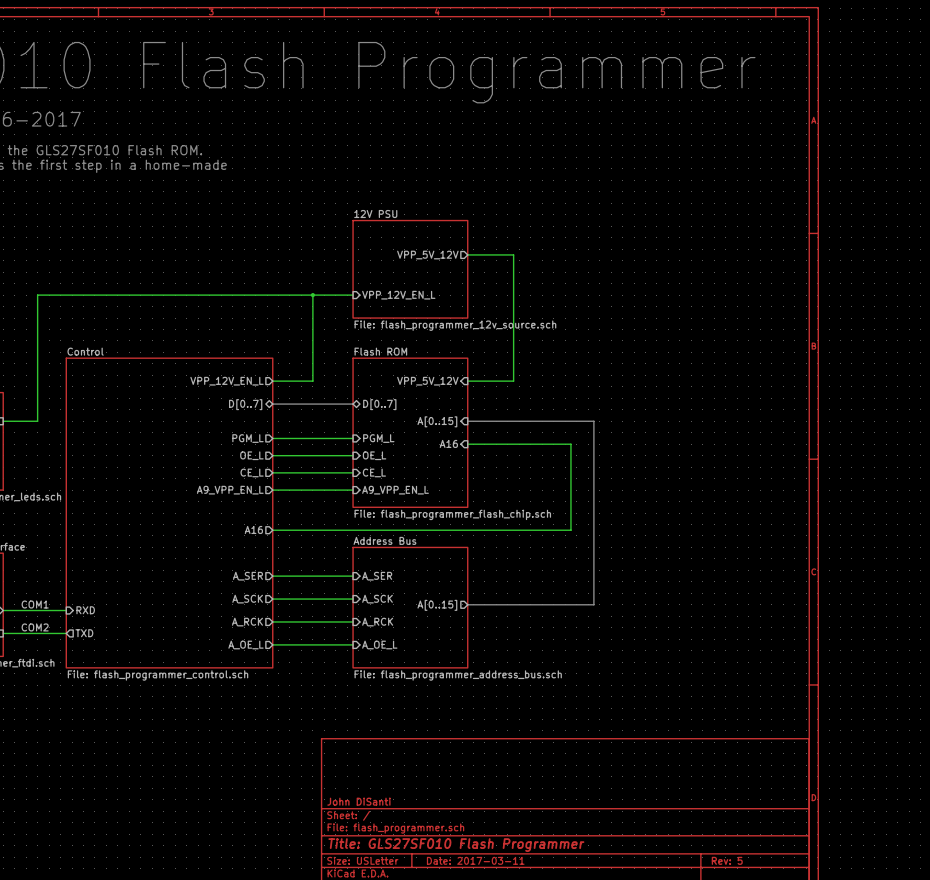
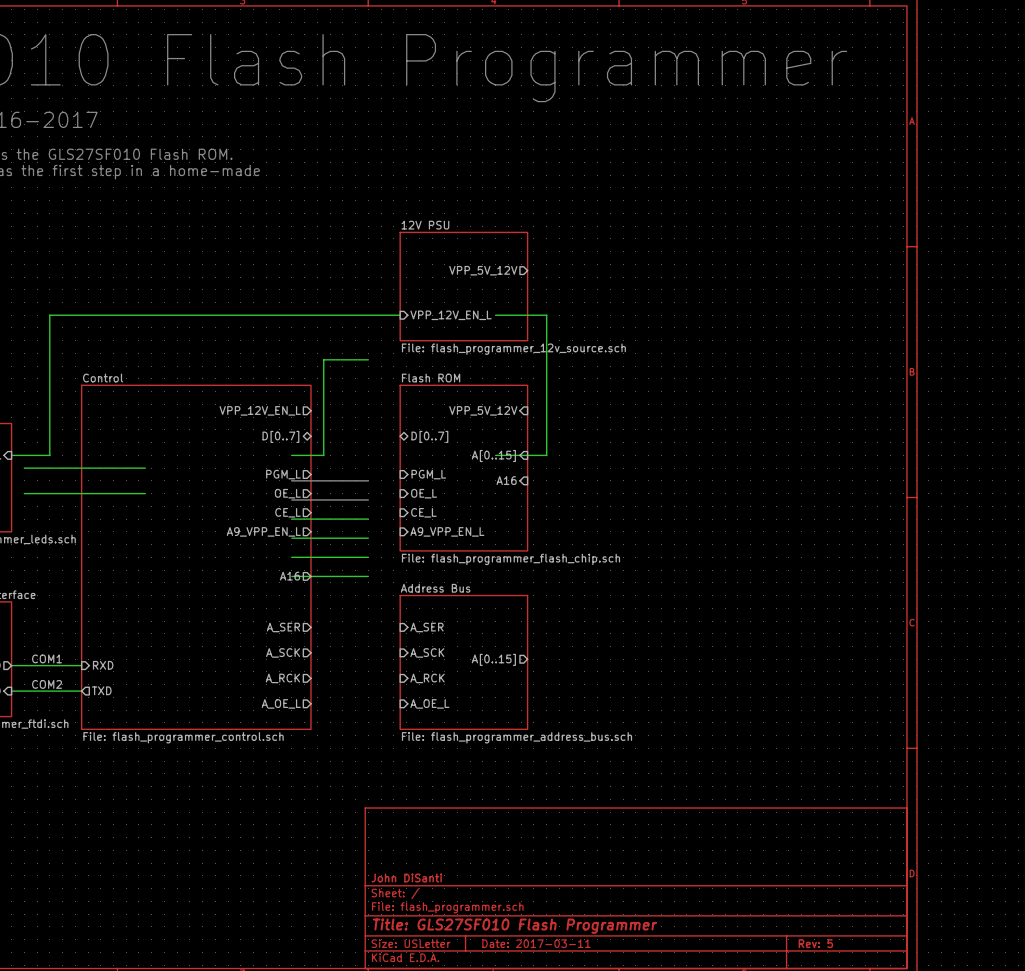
wire: (467, 254) (513, 254) (513, 381) (467, 381) -> (495, 315) (546, 315) (546, 455) (495, 455)
wire: (312, 295) (312, 381) (272, 381) -> none
junction: (312, 295) -> none
wire: none -> (368, 359) (323, 359) (323, 455) (291, 455)
bus: (272, 404) (353, 404) -> none
bus: (467, 421) (593, 421) (593, 604) (467, 604) -> none
wire: none -> (24, 468) (145, 468)
wire: (272, 438) (353, 438) -> none
bus: none -> (291, 480) (368, 480)
wire: (467, 444) (570, 444) (570, 530) (324, 530) -> none
wire: none -> (24, 493) (145, 493)
wire: (272, 455) (353, 455) -> none
bus: none -> (291, 499) (368, 499)
wire: (272, 472) (353, 472) -> none
wire: none -> (291, 519) (368, 519)
wire: (272, 490) (353, 490) -> none
wire: none -> (291, 538) (368, 538)
wire: none -> (291, 557) (368, 557)
wire: none -> (291, 576) (310, 576)
wire: (272, 576) (353, 576) -> none
wire: (272, 599) (353, 599) -> none
wire: (272, 621) (353, 621) -> none
wire: (272, 644) (353, 644) -> none

